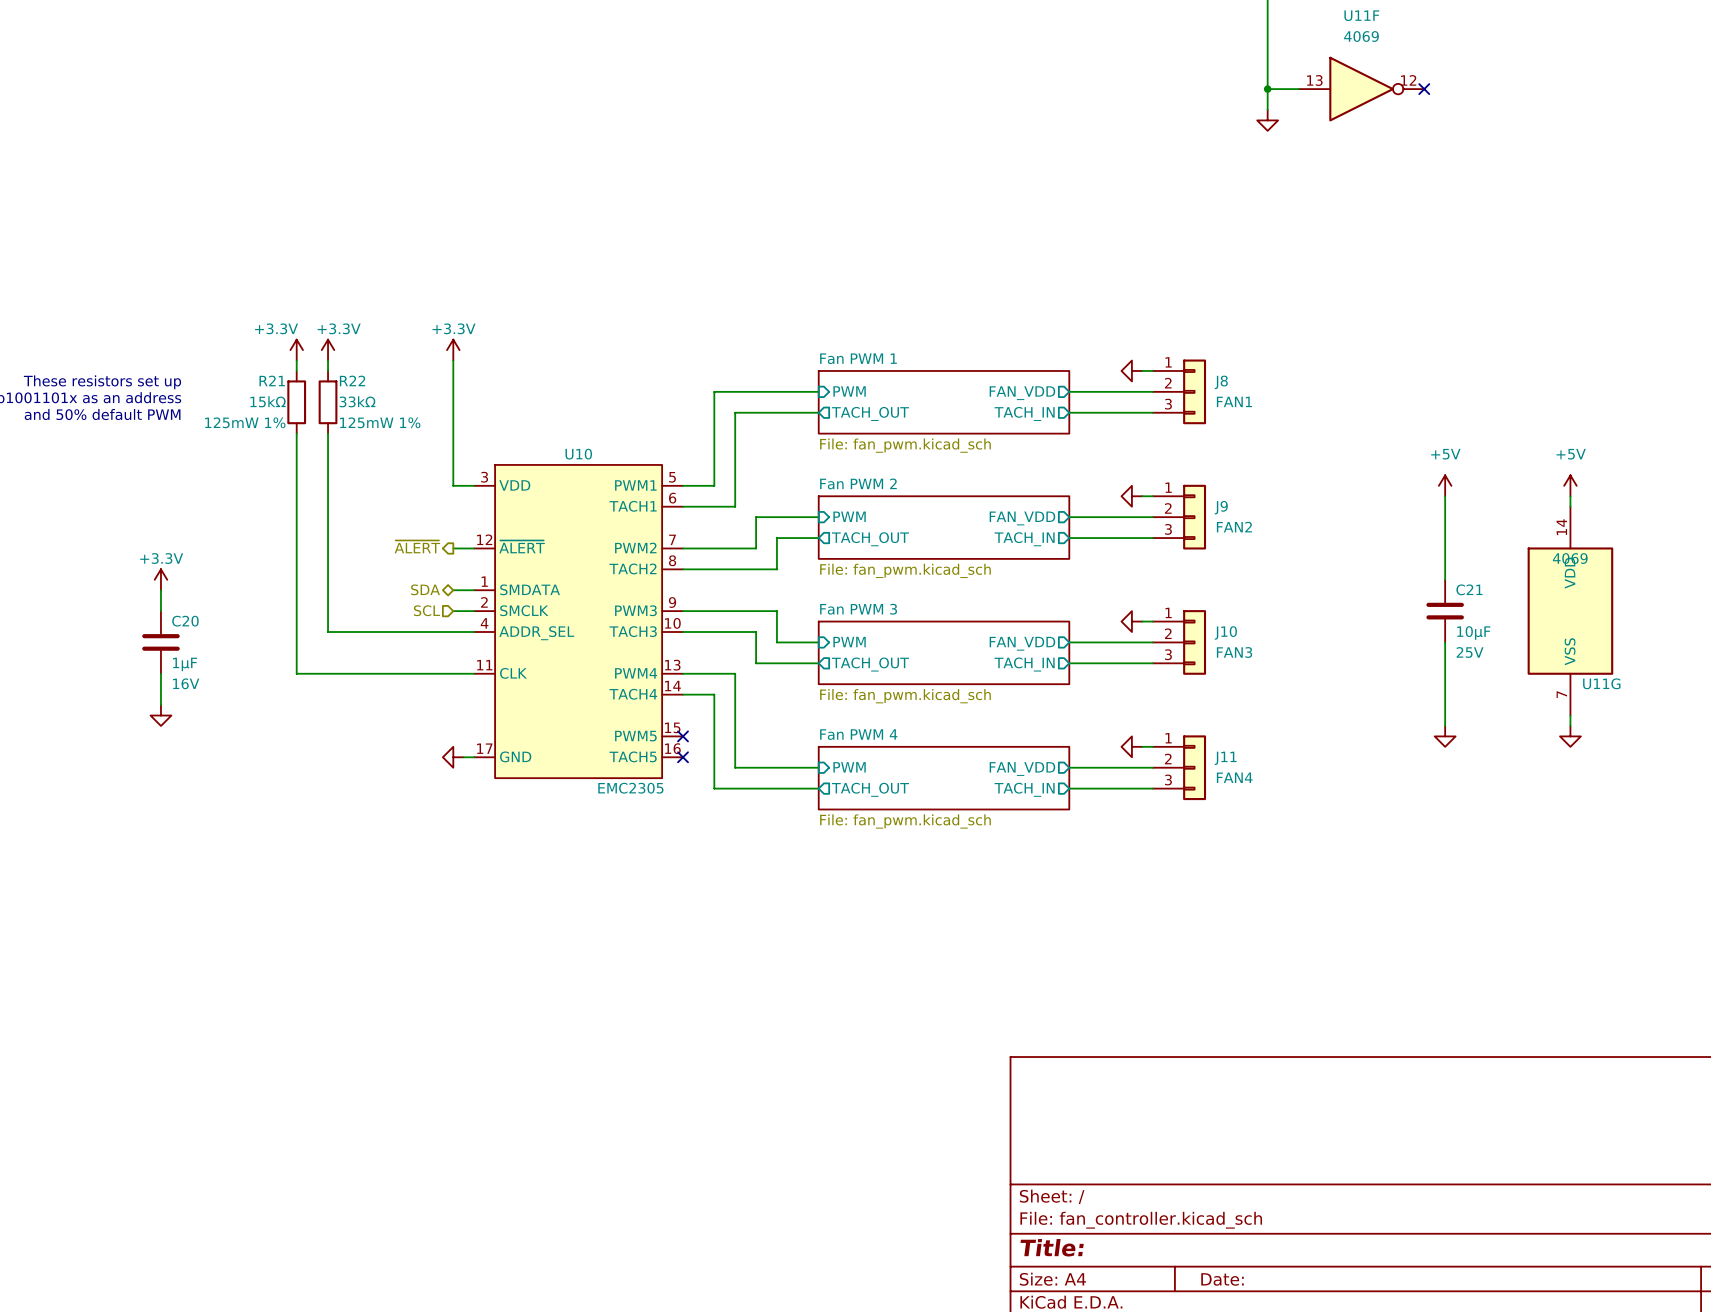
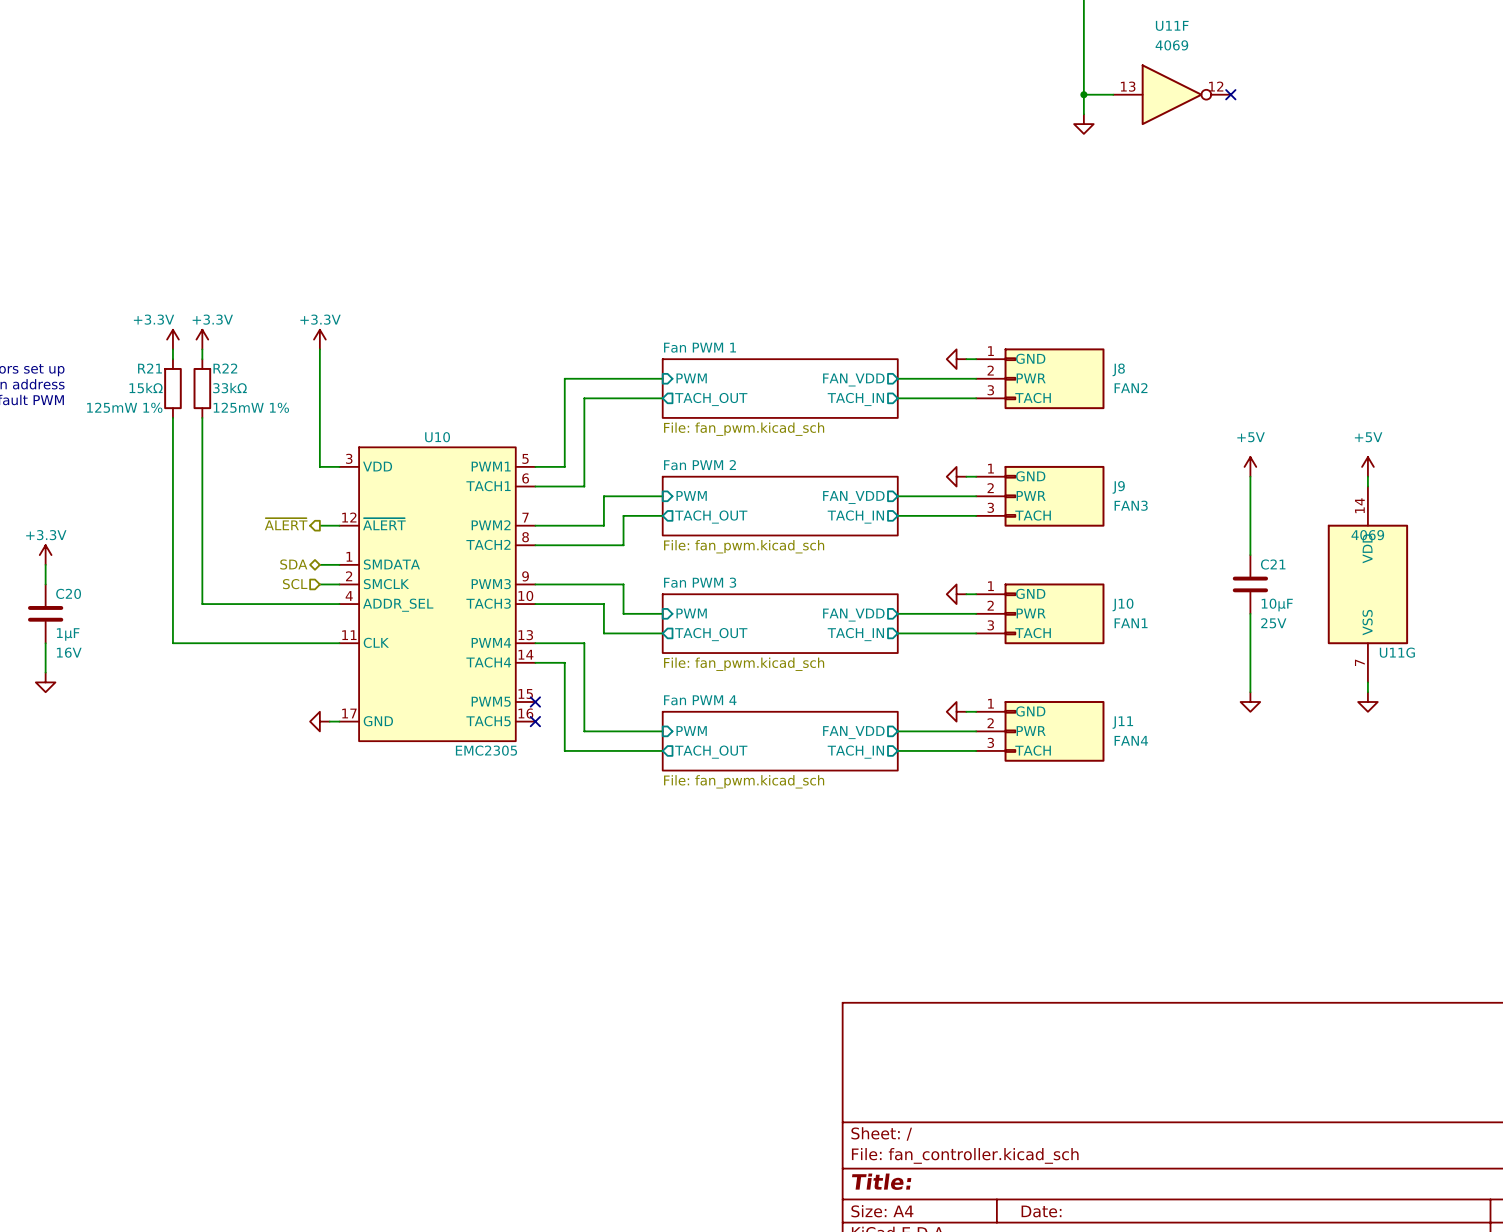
J8 symbol: [1152, 359, 1207, 425] -> [976, 348, 1105, 410]
J8 text: none -> GND (1030, 358)
J8 name position: J8 (1221, 382) -> J8 (1118, 369)
J8 text: none -> PWR (1031, 378)
J8 text: FAN1 (1234, 401) -> FAN2 (1131, 388)
J8 text: none -> TACH (1033, 397)
J9 symbol: [1152, 484, 1207, 550] -> [976, 465, 1105, 527]
J9 text: none -> GND (1030, 476)
J9 name position: J9 (1221, 507) -> J9 (1118, 487)
J9 text: none -> PWR (1031, 495)
J9 text: FAN2 (1234, 527) -> FAN3 (1131, 505)
J9 text: none -> TACH (1033, 515)
J10 symbol: [1152, 610, 1207, 675] -> [976, 583, 1105, 645]
J10 text: none -> GND (1030, 593)
J10 name position: J10 (1225, 632) -> J10 (1123, 604)
J10 text: none -> PWR (1031, 613)
J10 text: FAN3 (1234, 652) -> FAN1 (1131, 623)
J10 text: none -> TACH (1033, 633)
J11 symbol: [1152, 735, 1207, 801] -> [976, 701, 1105, 762]
J11 text: none -> GND (1030, 711)
J11 name position: J11 (1225, 758) -> J11 (1122, 722)
J11 text: none -> PWR (1031, 731)
J11 text position: FAN4 (1234, 777) -> FAN4 (1131, 740)
J11 text: none -> TACH (1033, 750)

